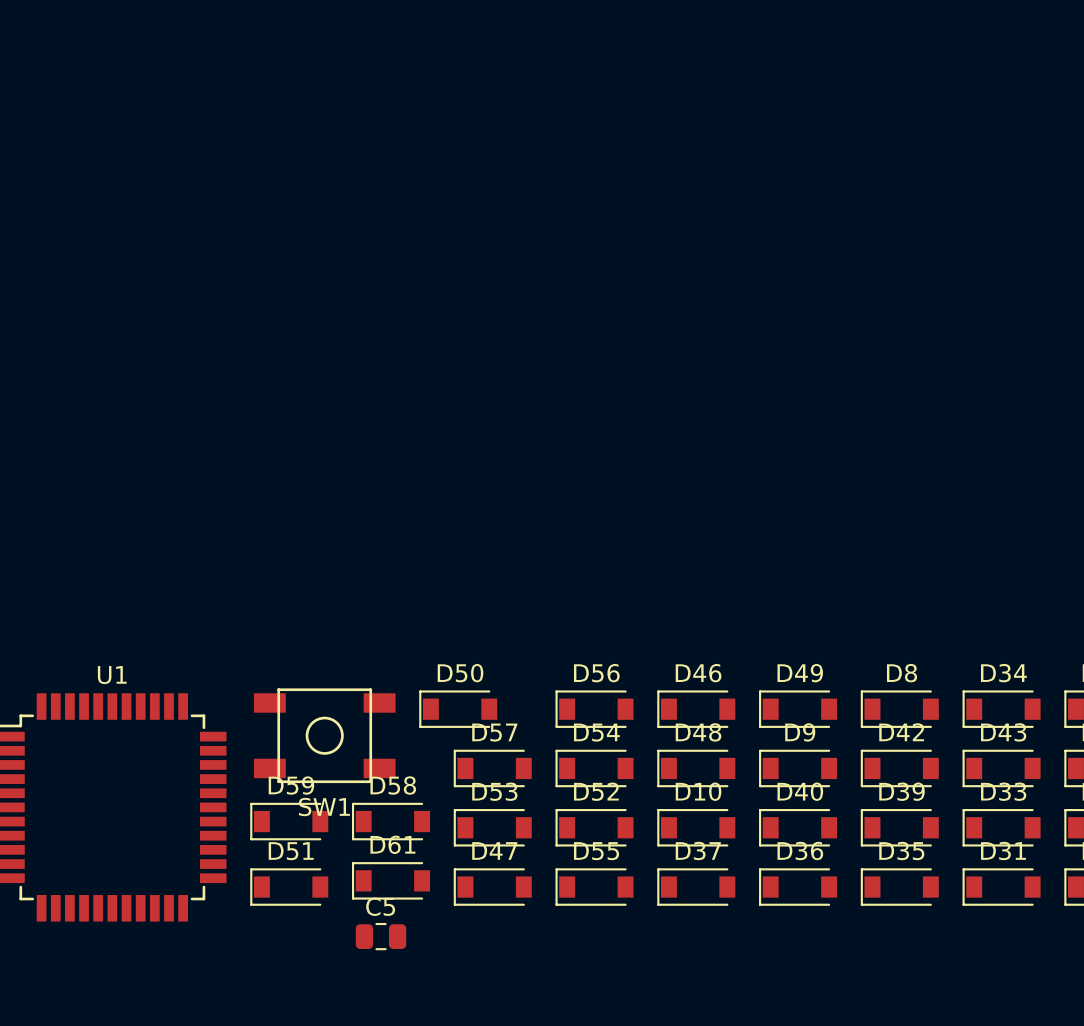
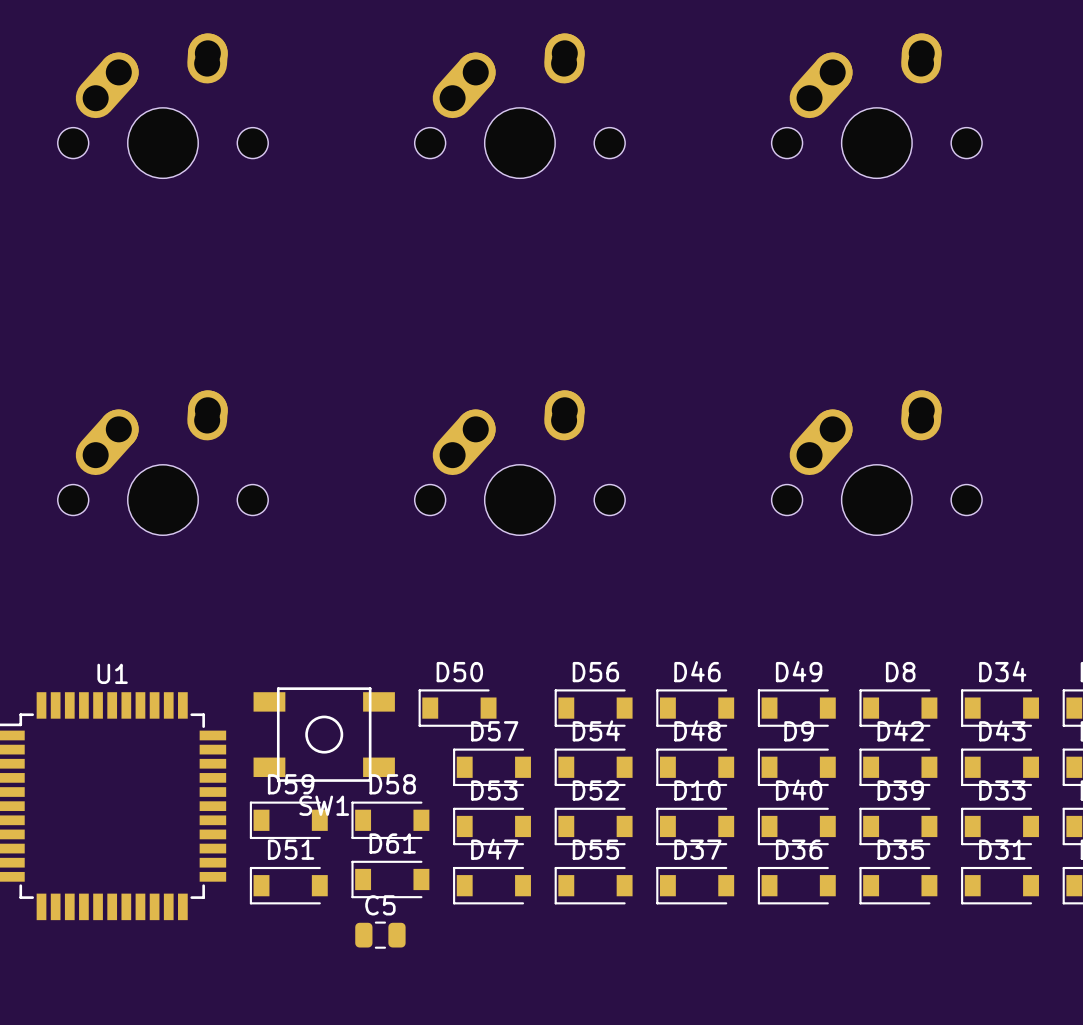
part: none -> (162, 105)
part: none -> (519, 105)
part: none -> (876, 105)
part: none -> (162, 462)
part: none -> (519, 462)
part: none -> (876, 462)

